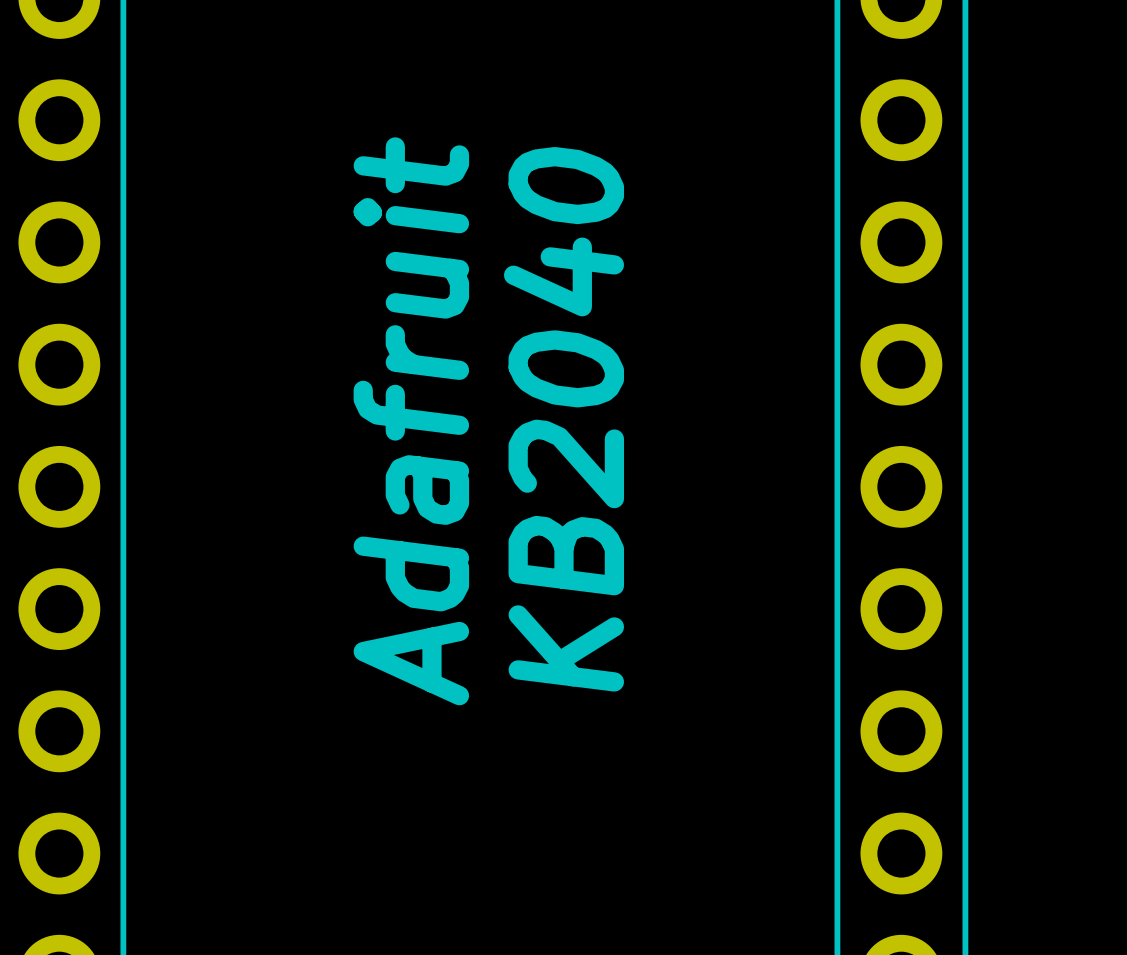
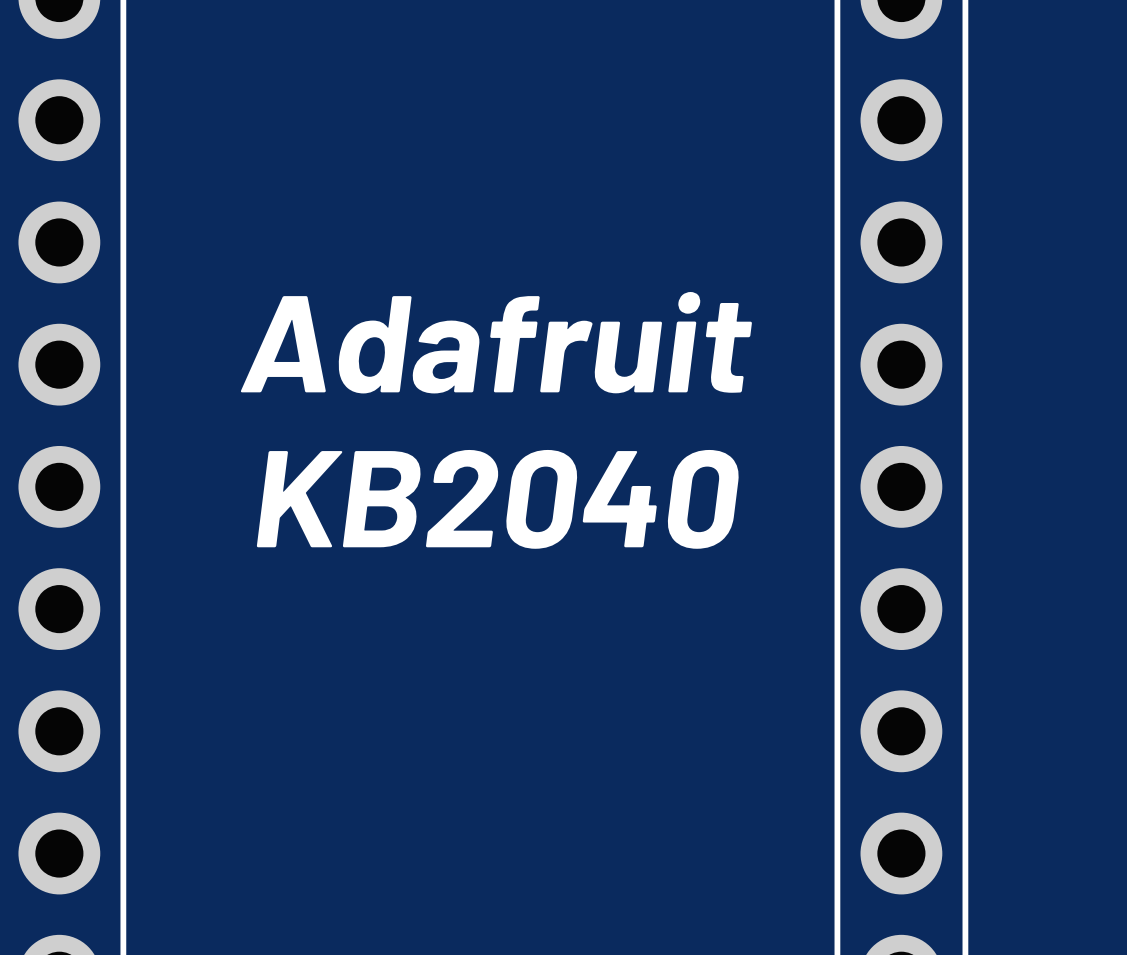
text rotation: 0° (563, 419) -> 90° clockwise (498, 499)
text rotation: 0° (411, 421) -> 90° clockwise (496, 342)

